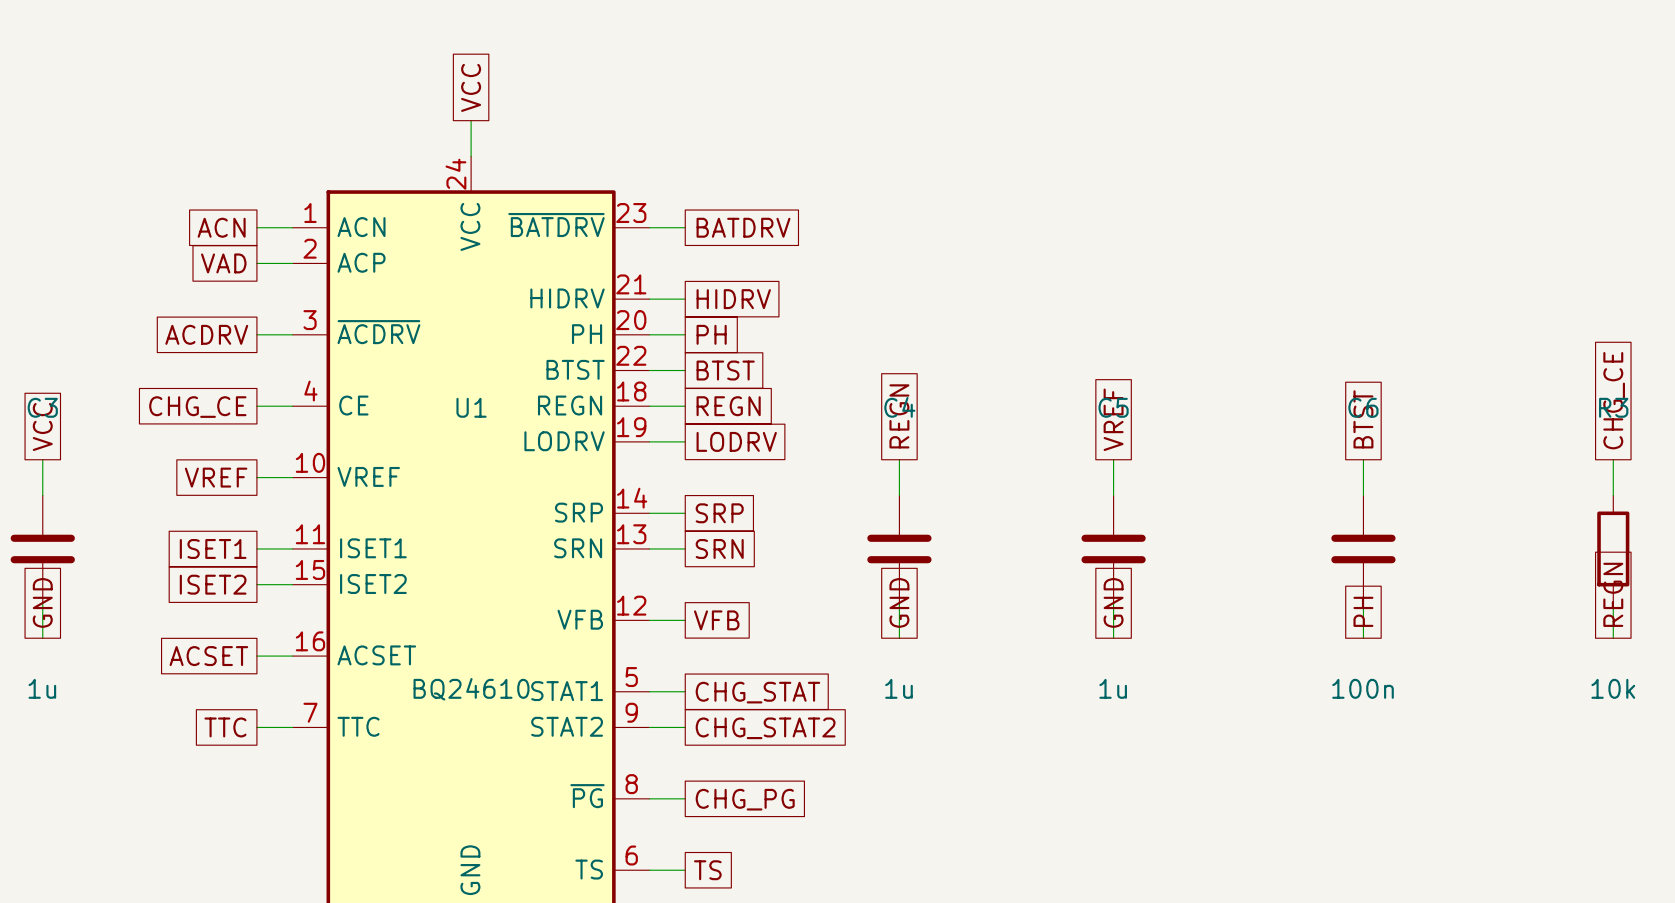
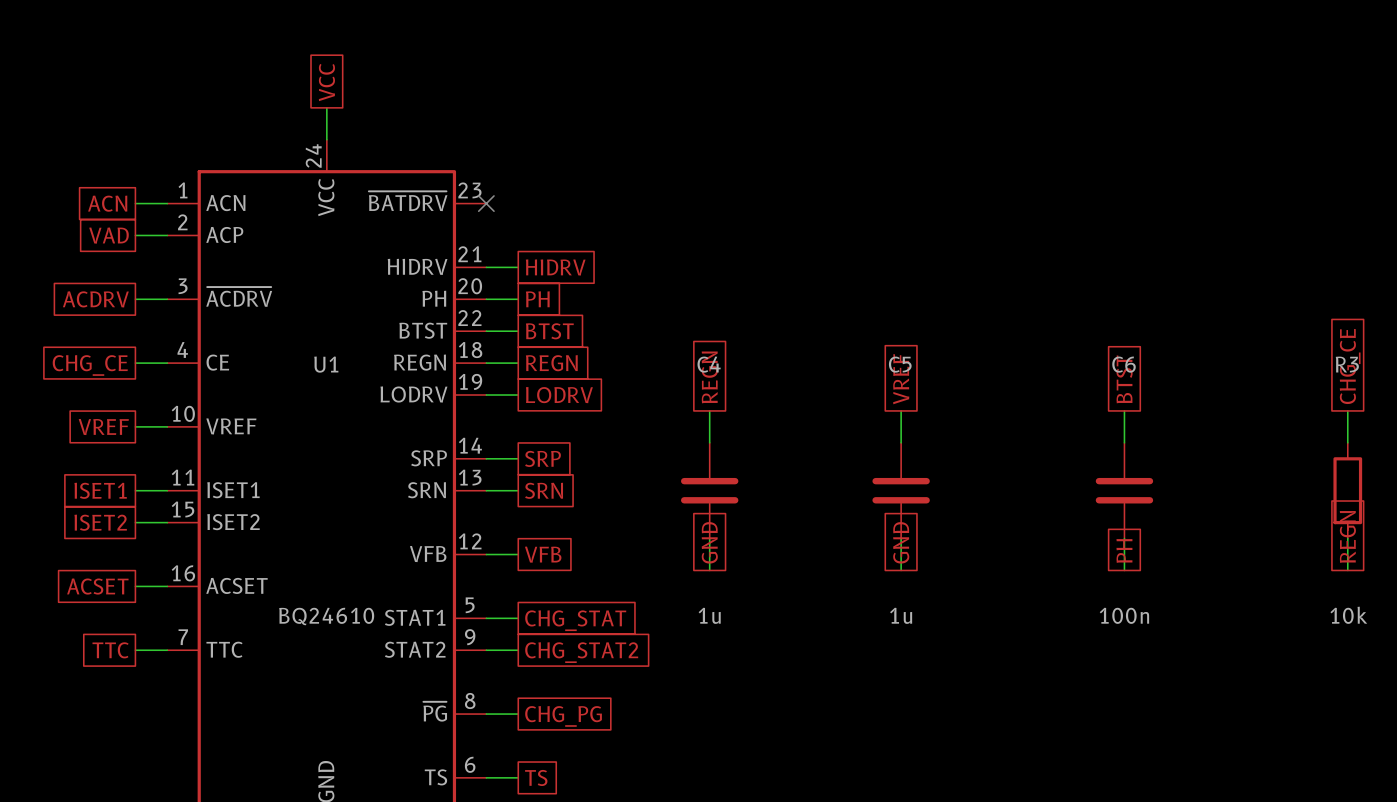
wire: (649, 227) (685, 227) -> none
no-connect mark: none -> (486, 203)
global label: BATDRV (743, 227) -> none

